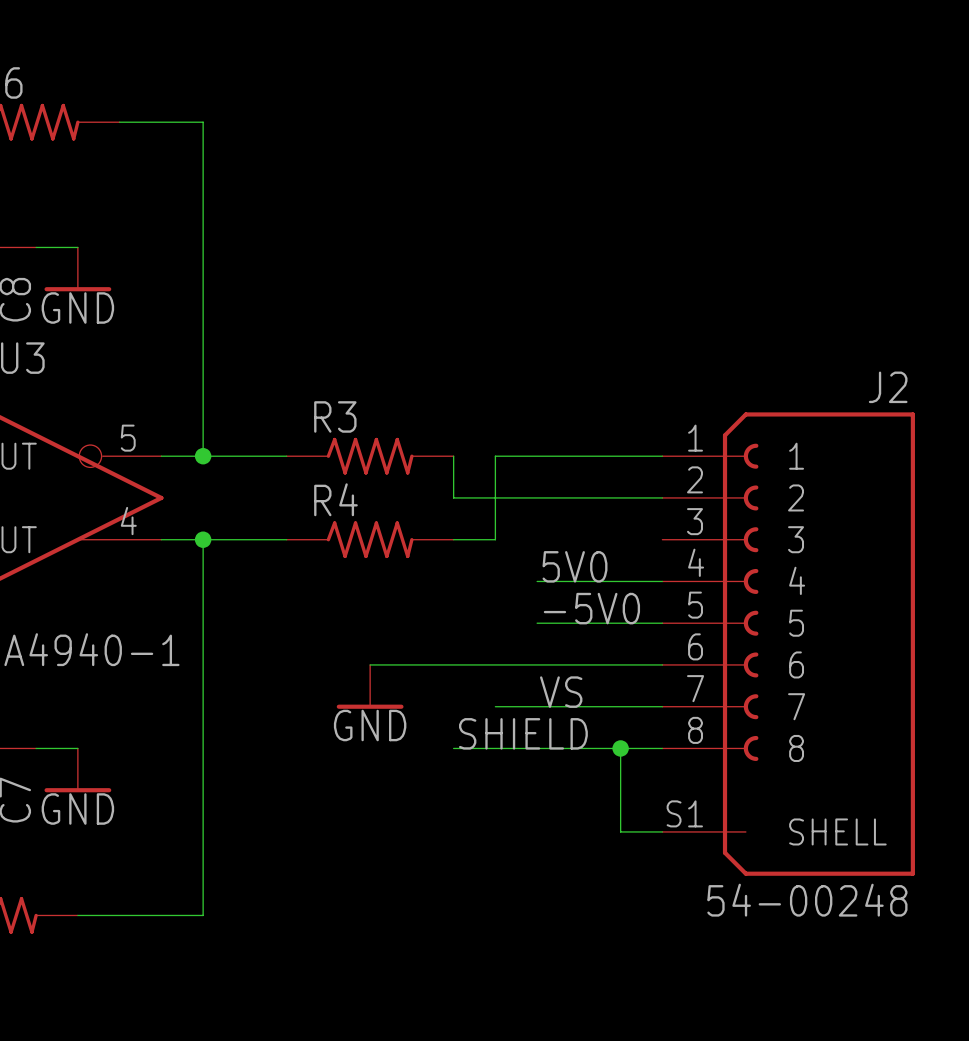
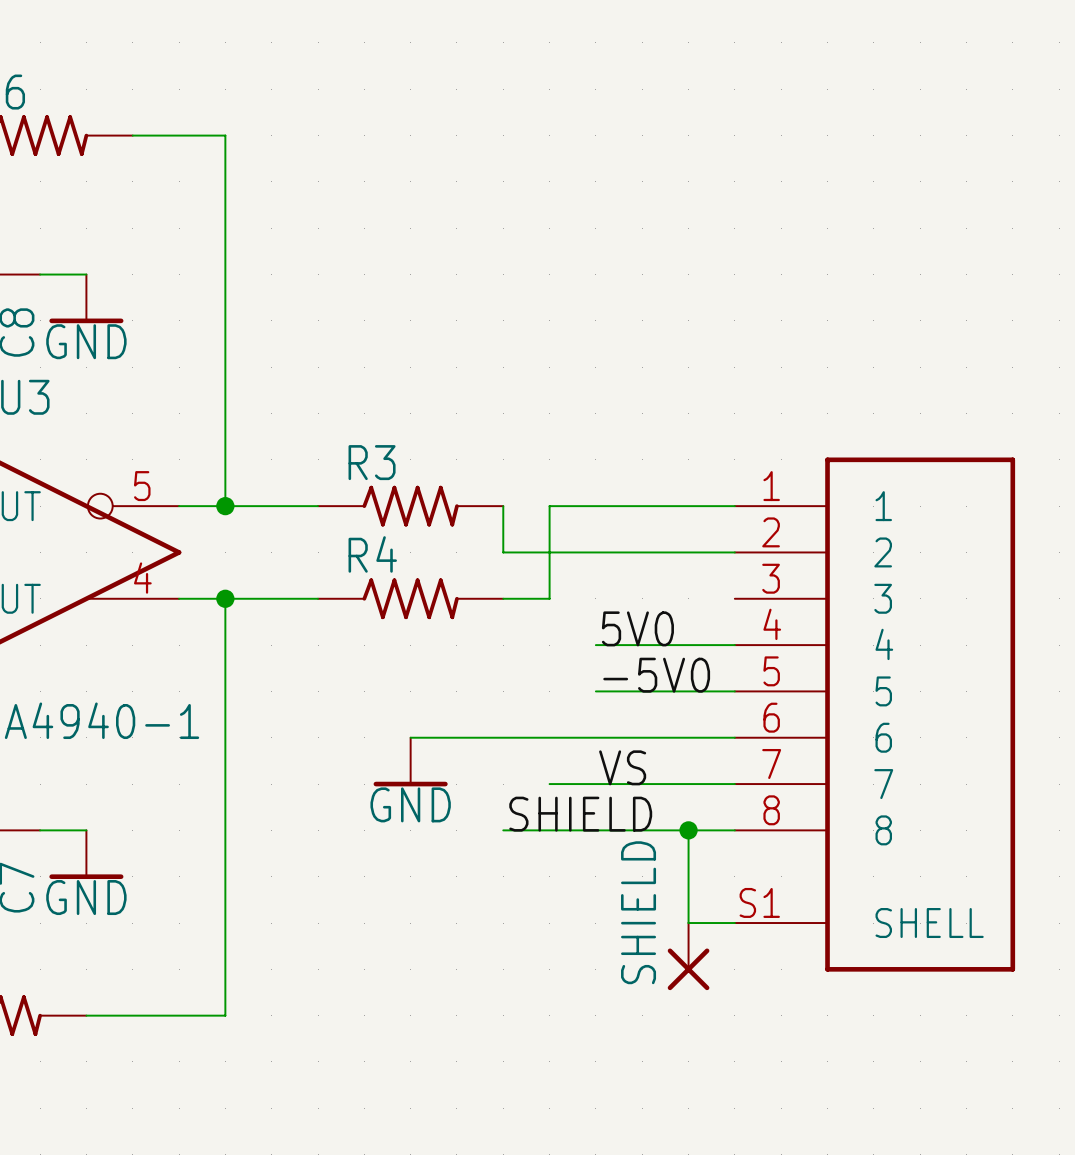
J2: 54-00248 (788, 644) -> none
part: none -> (874, 714)
SHIELD: none -> (688, 956)

